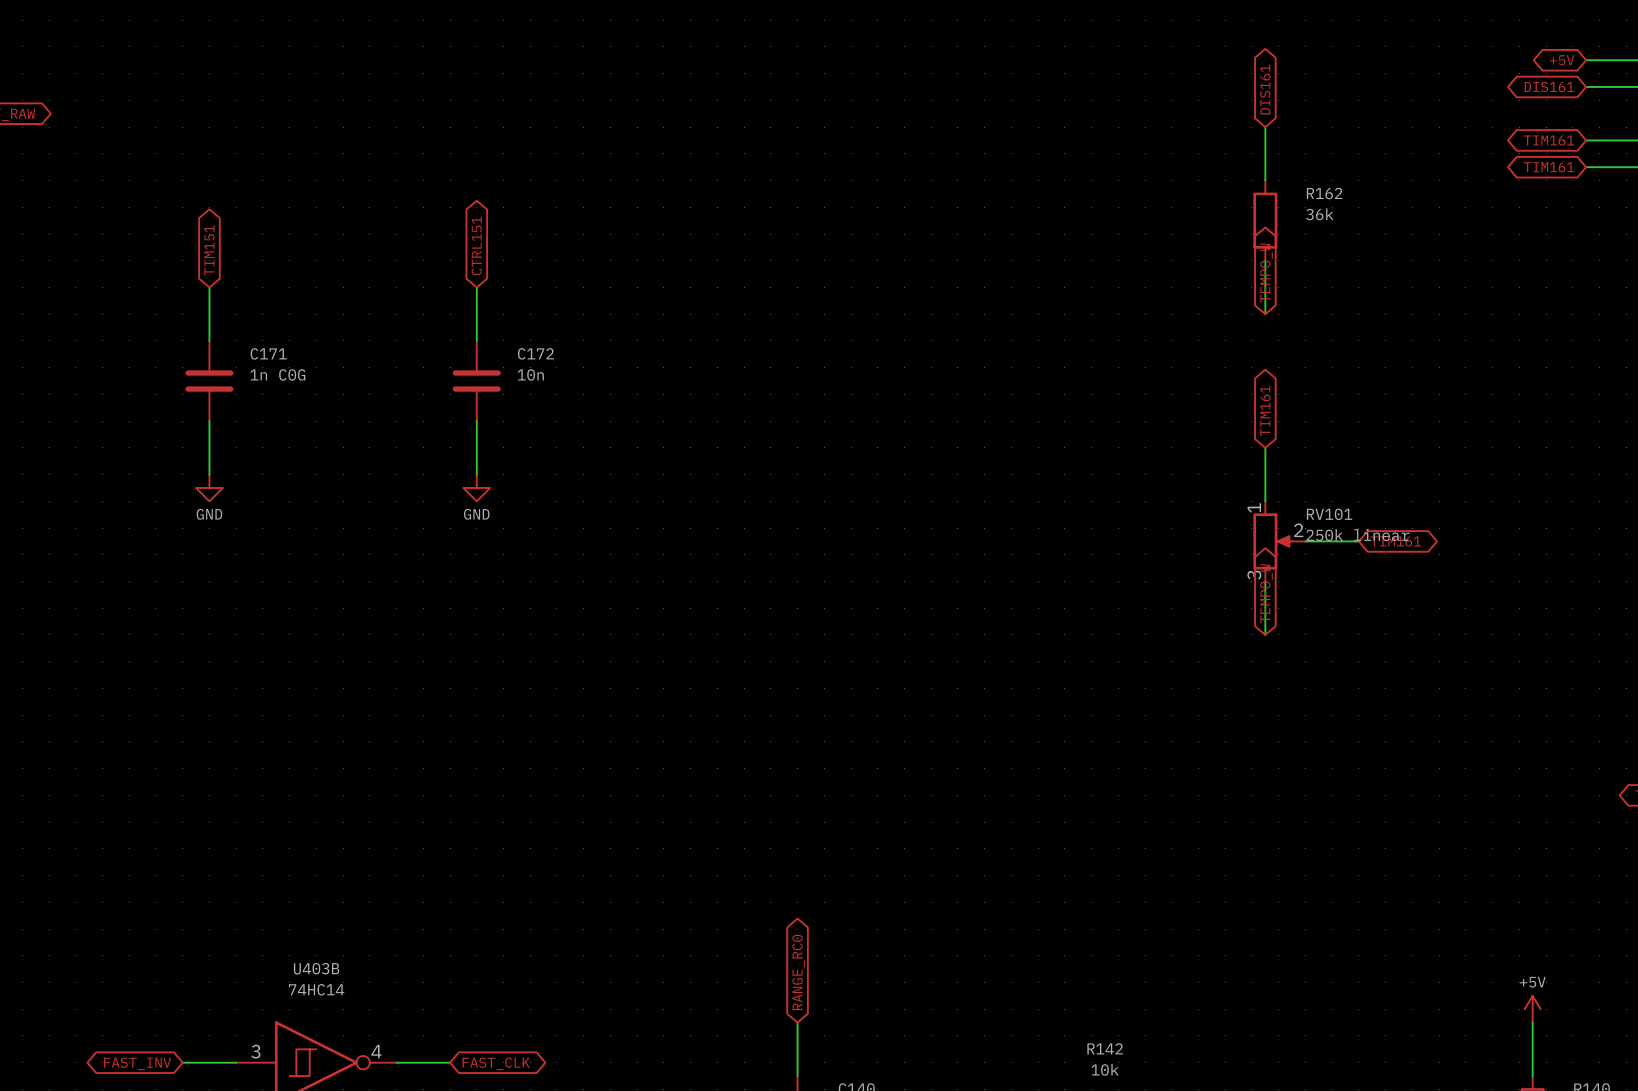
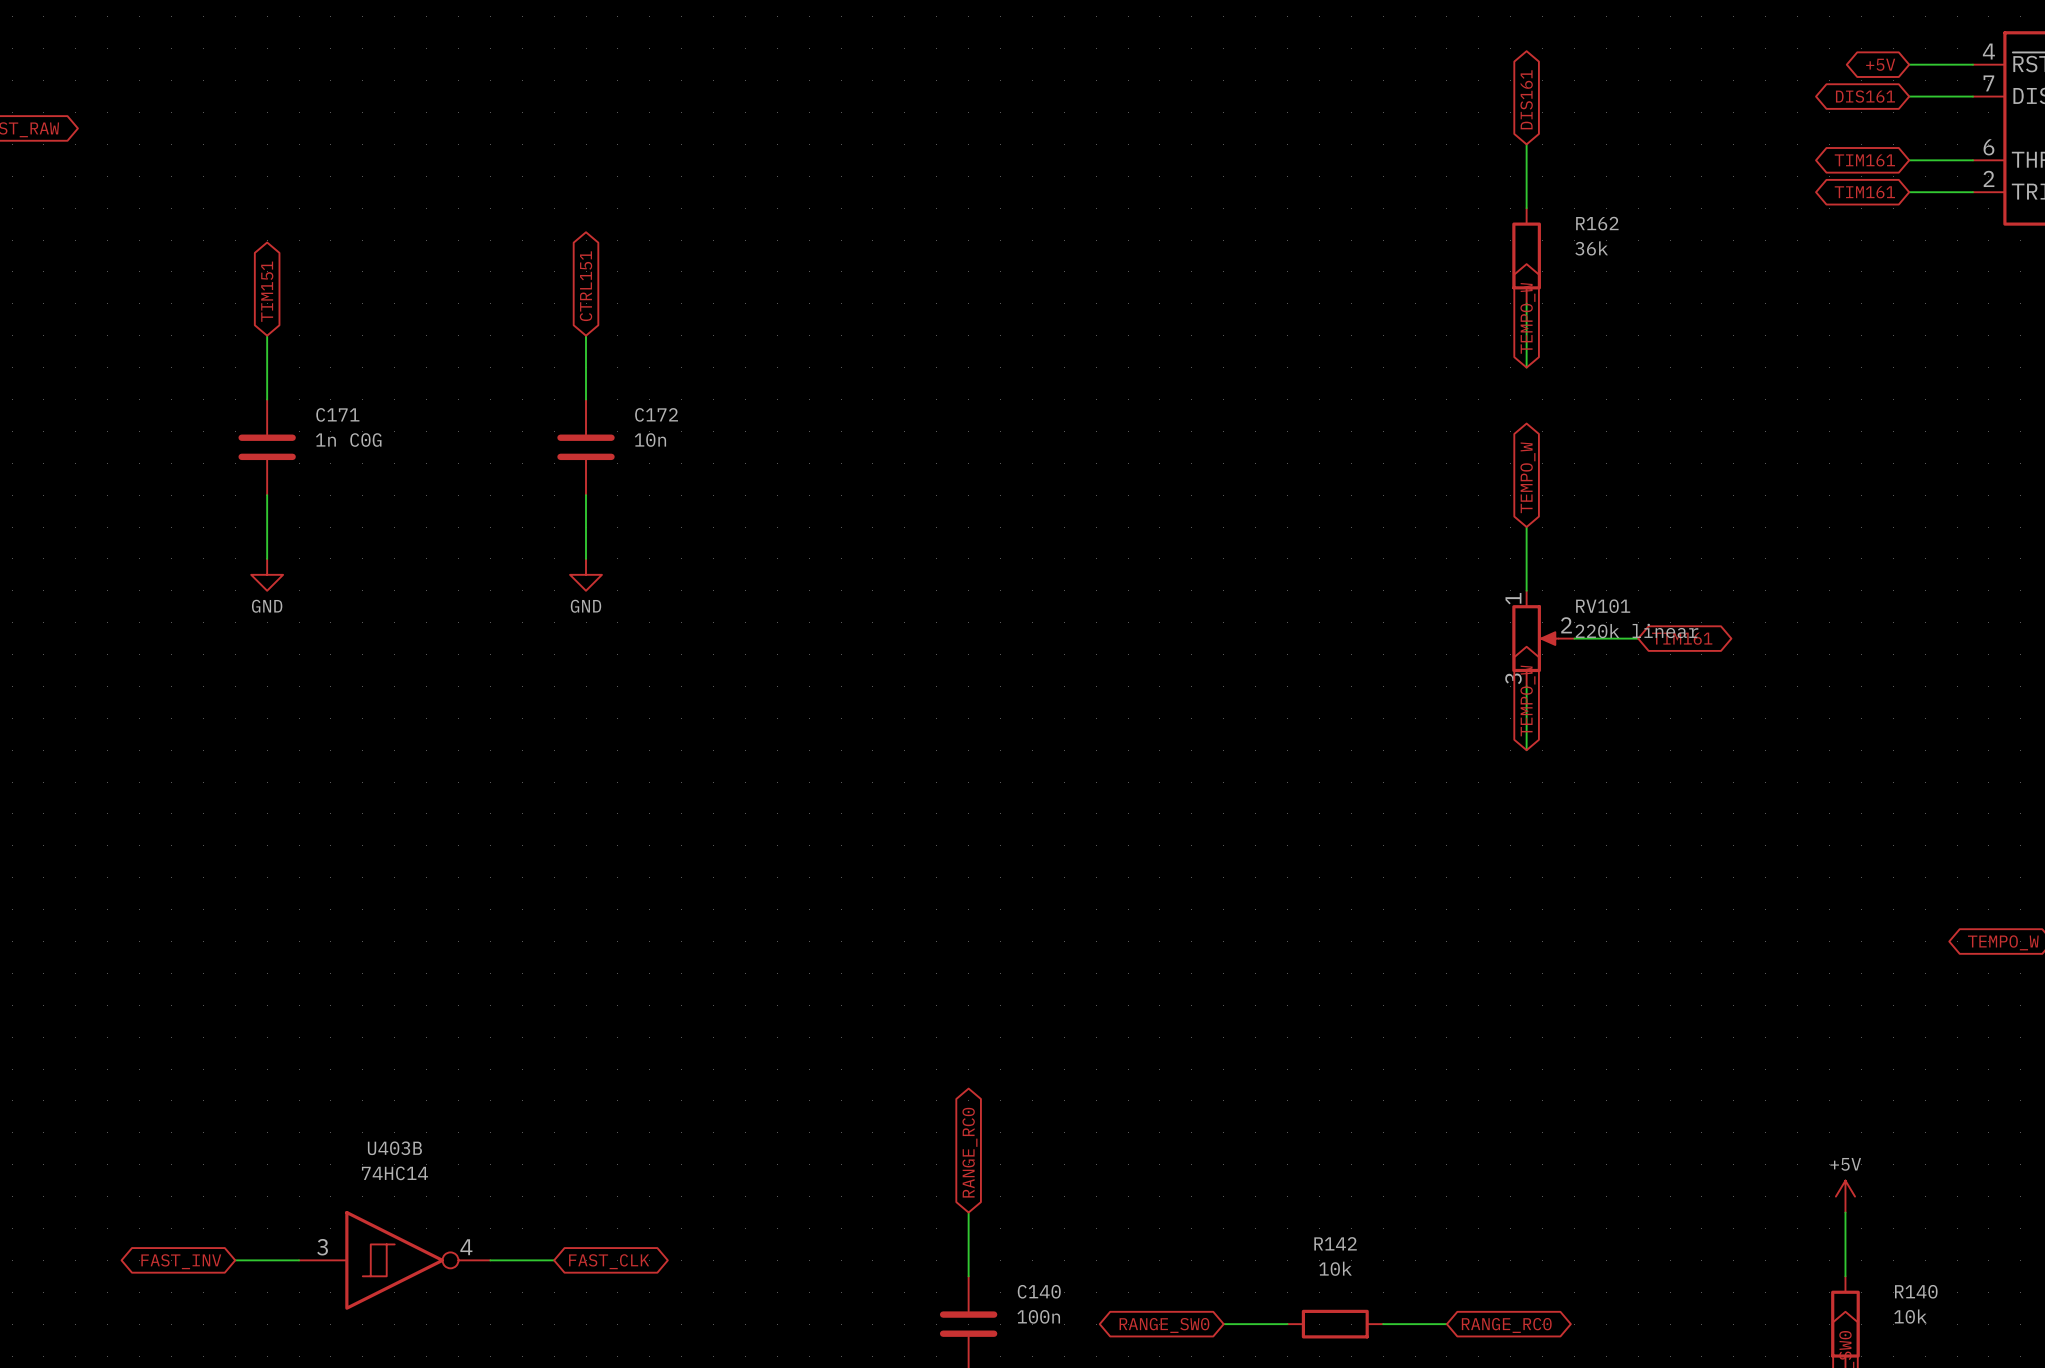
global label: TIM161 (1265, 410) -> TEMPO_W (1527, 477)
RV101 value: 250k linear (1357, 535) -> 220k linear (1636, 630)

